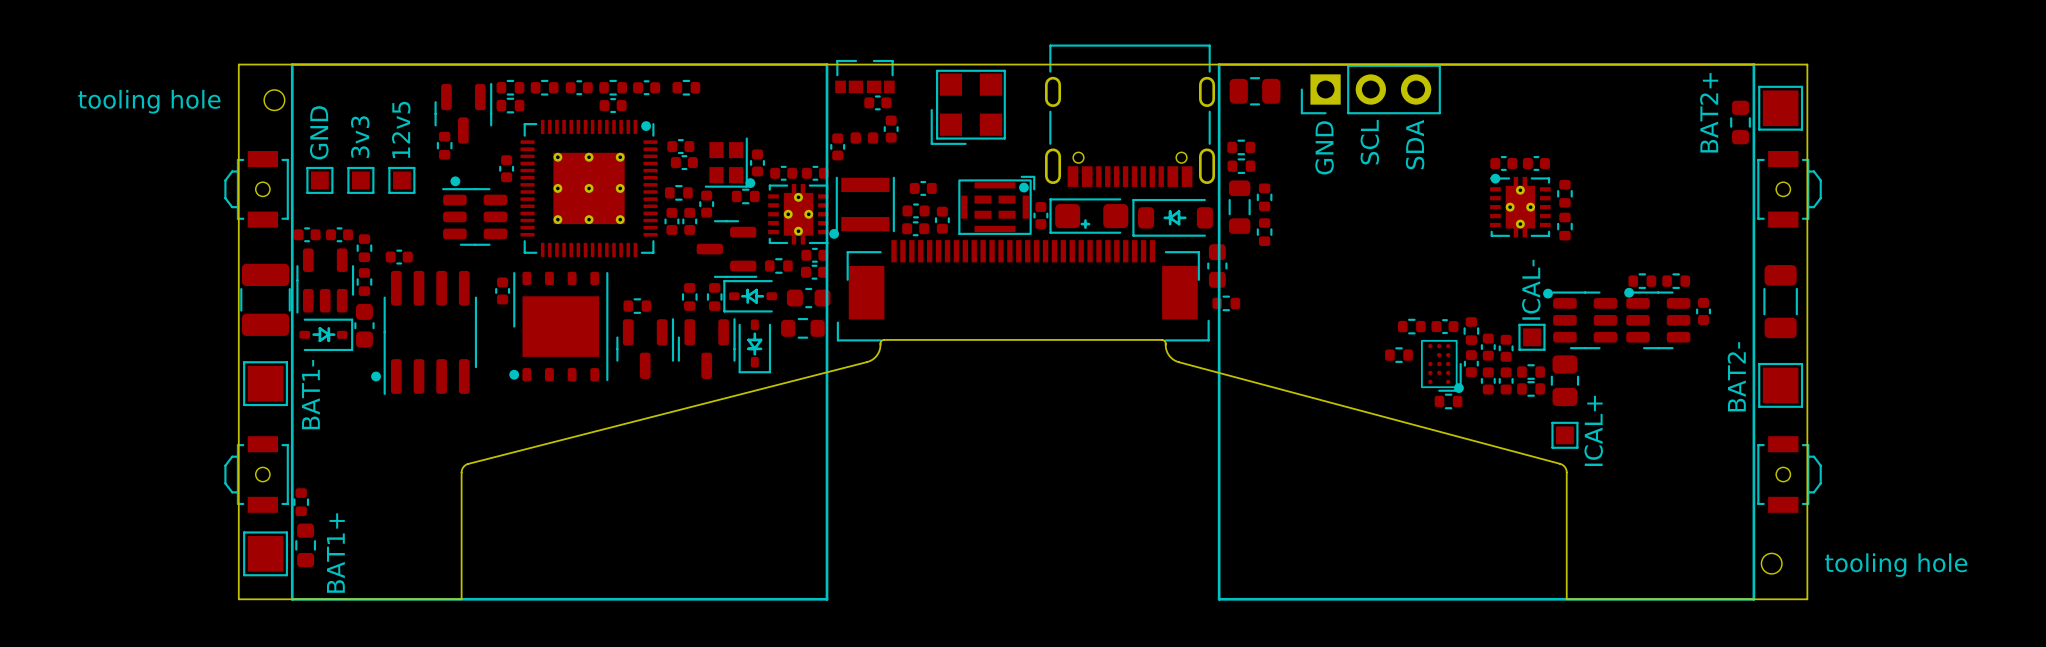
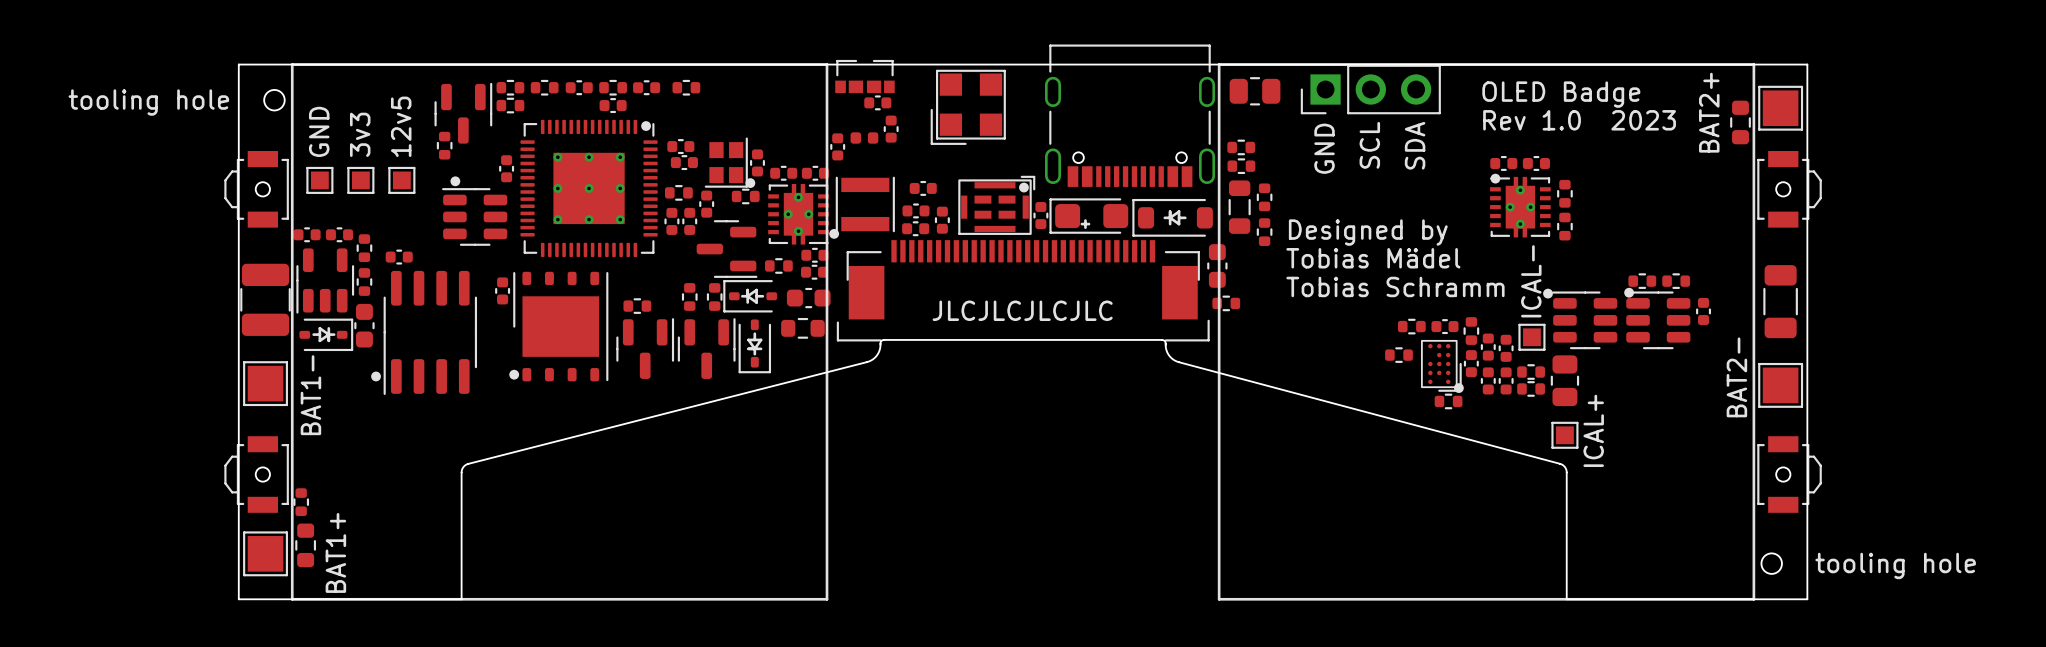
text: none -> OLED Badge (1561, 94)
text: none -> Rev 1.0 2023 (1579, 120)
text: none -> Designed by (1368, 232)
text: none -> Tobias Mädel (1373, 258)
text: none -> Tobias Schramm (1395, 286)
text: none -> JLCJLCJLCJLC (1022, 310)

